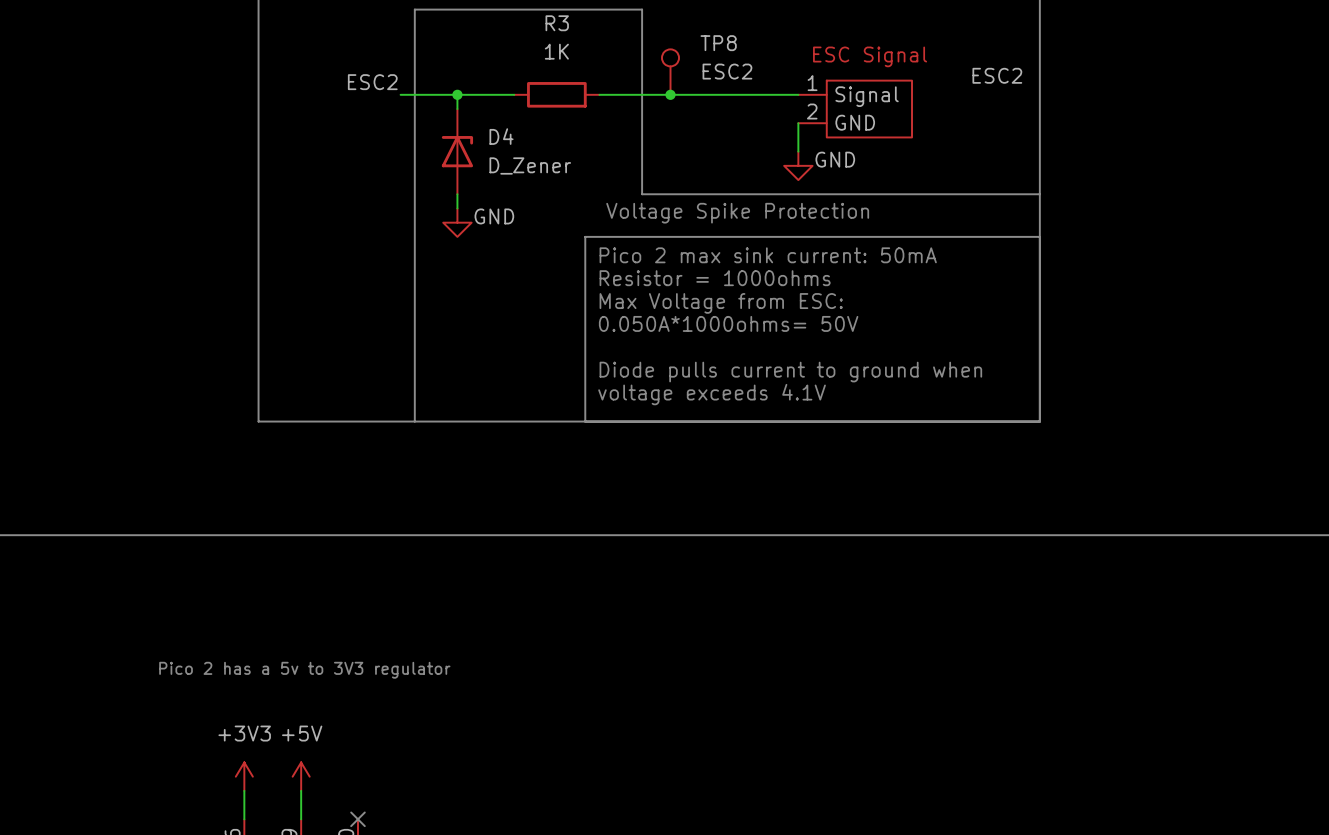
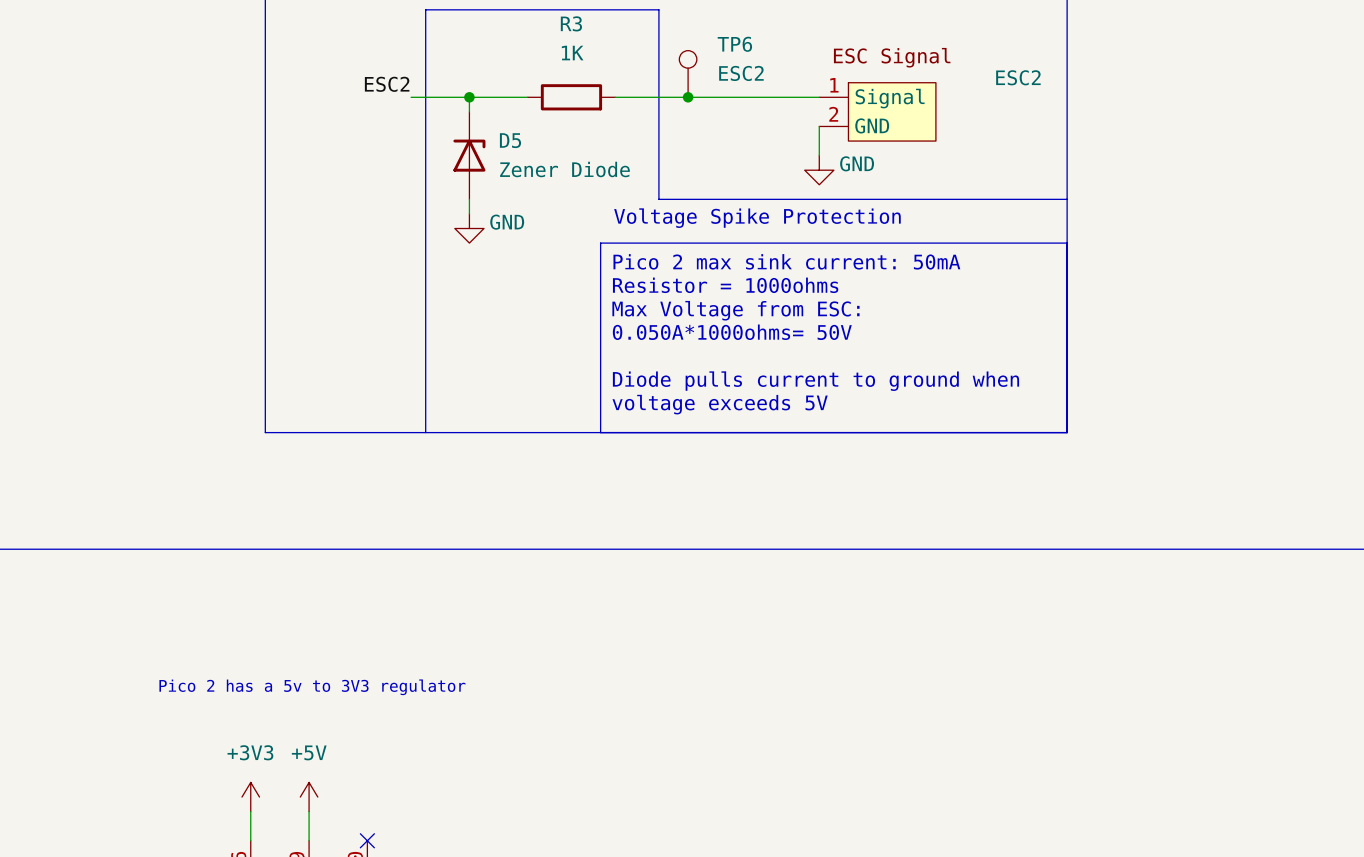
TP8 name: TP8 (718, 43) -> TP6 (734, 44)
D4 name: D4 (501, 136) -> D5 (510, 140)
D4 value: D_Zener (530, 165) -> Zener Diode (564, 169)
text: voltage exceeds 4.1V (712, 394) -> voltage exceeds 5V (720, 404)

